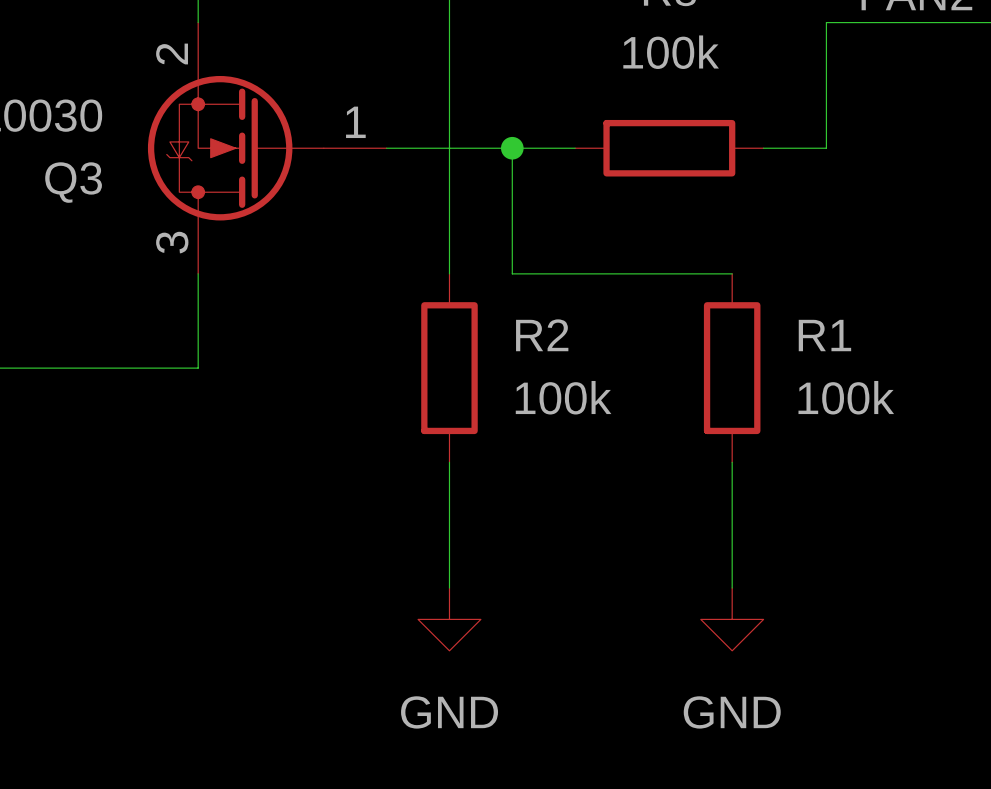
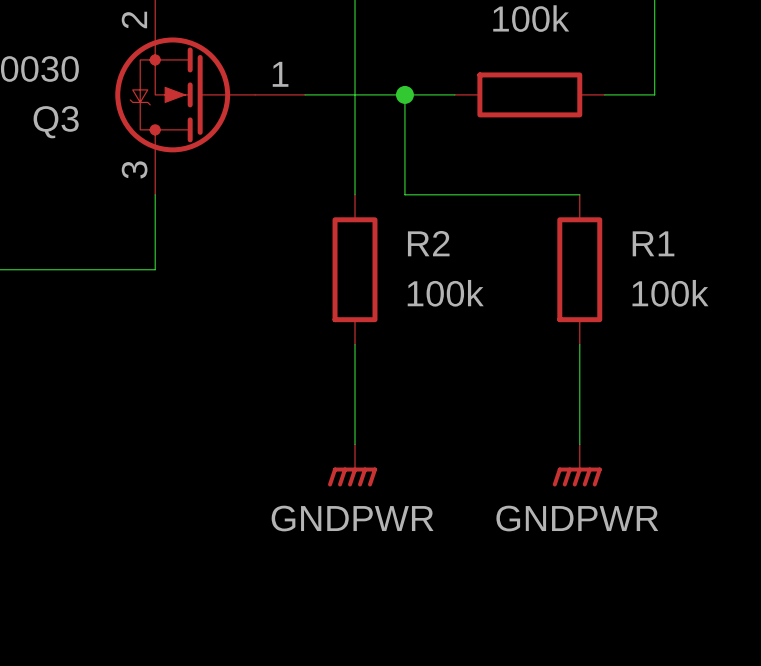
power symbol: GND (449, 619) -> GNDPWR (352, 465)
power symbol: GND (732, 619) -> GNDPWR (577, 465)

